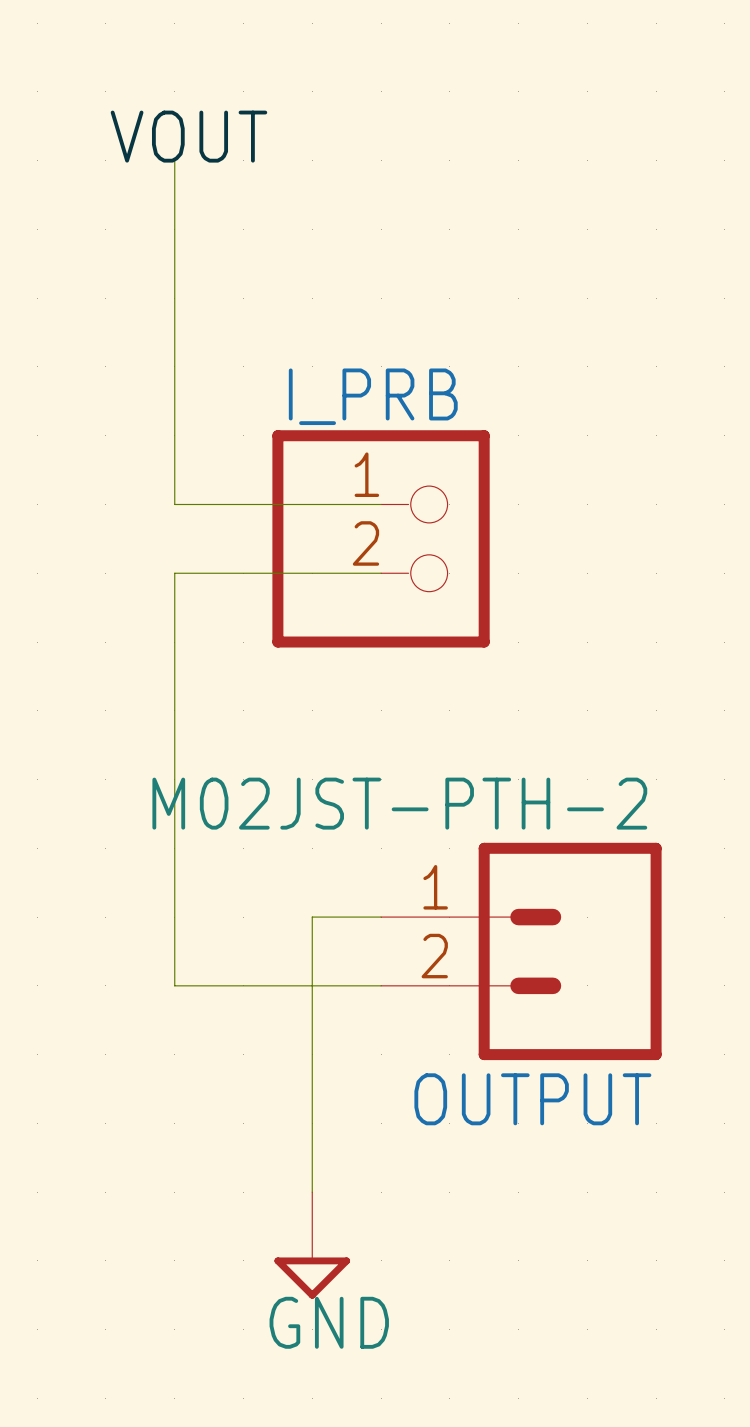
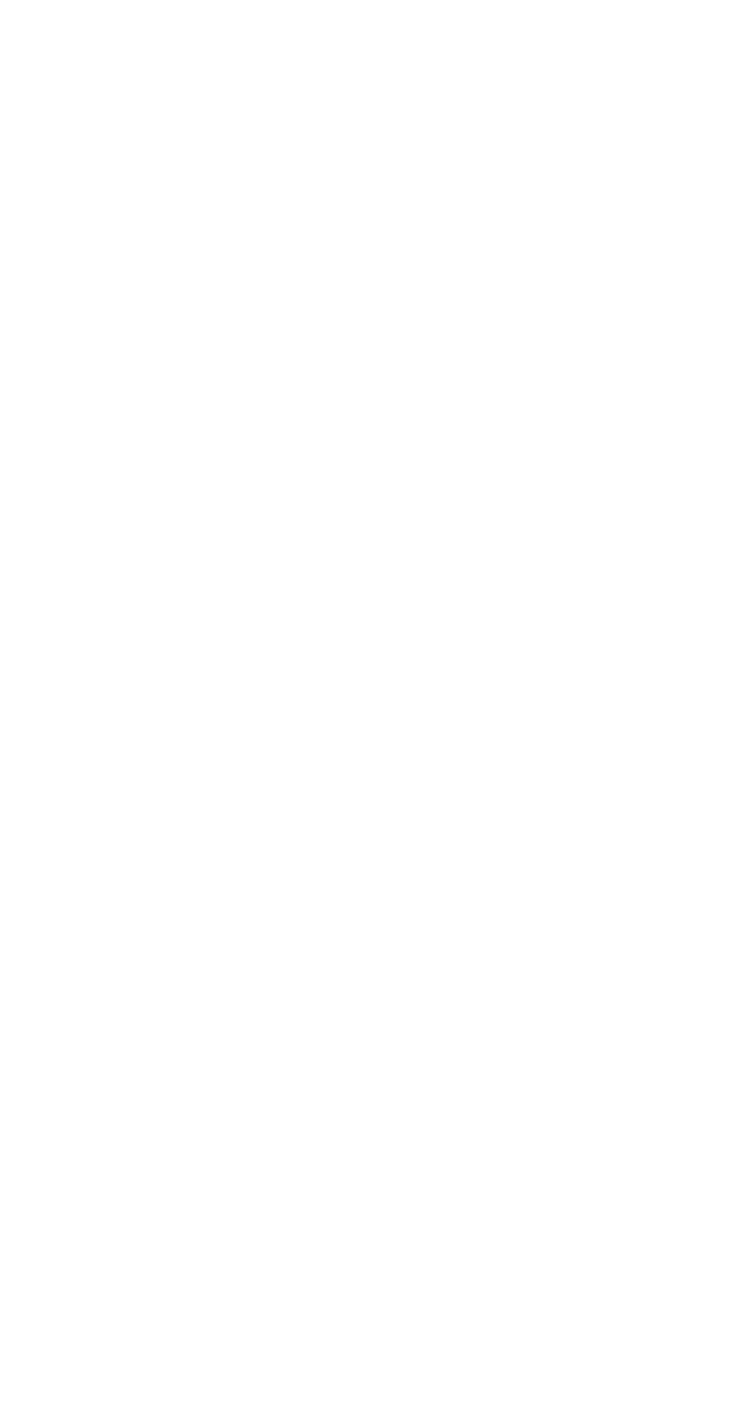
label: VOUT (188, 136) -> none
wire: (174, 160) (174, 504) (381, 504) -> none
I_PRB: (381, 538) -> none
wire: (381, 573) (174, 573) (174, 985) (381, 985) -> none
wire: (381, 917) (312, 917) (312, 1192) -> none
OUTPUT: M02JST-PTH-2 (521, 951) -> none
power symbol: GND (312, 1245) -> none

